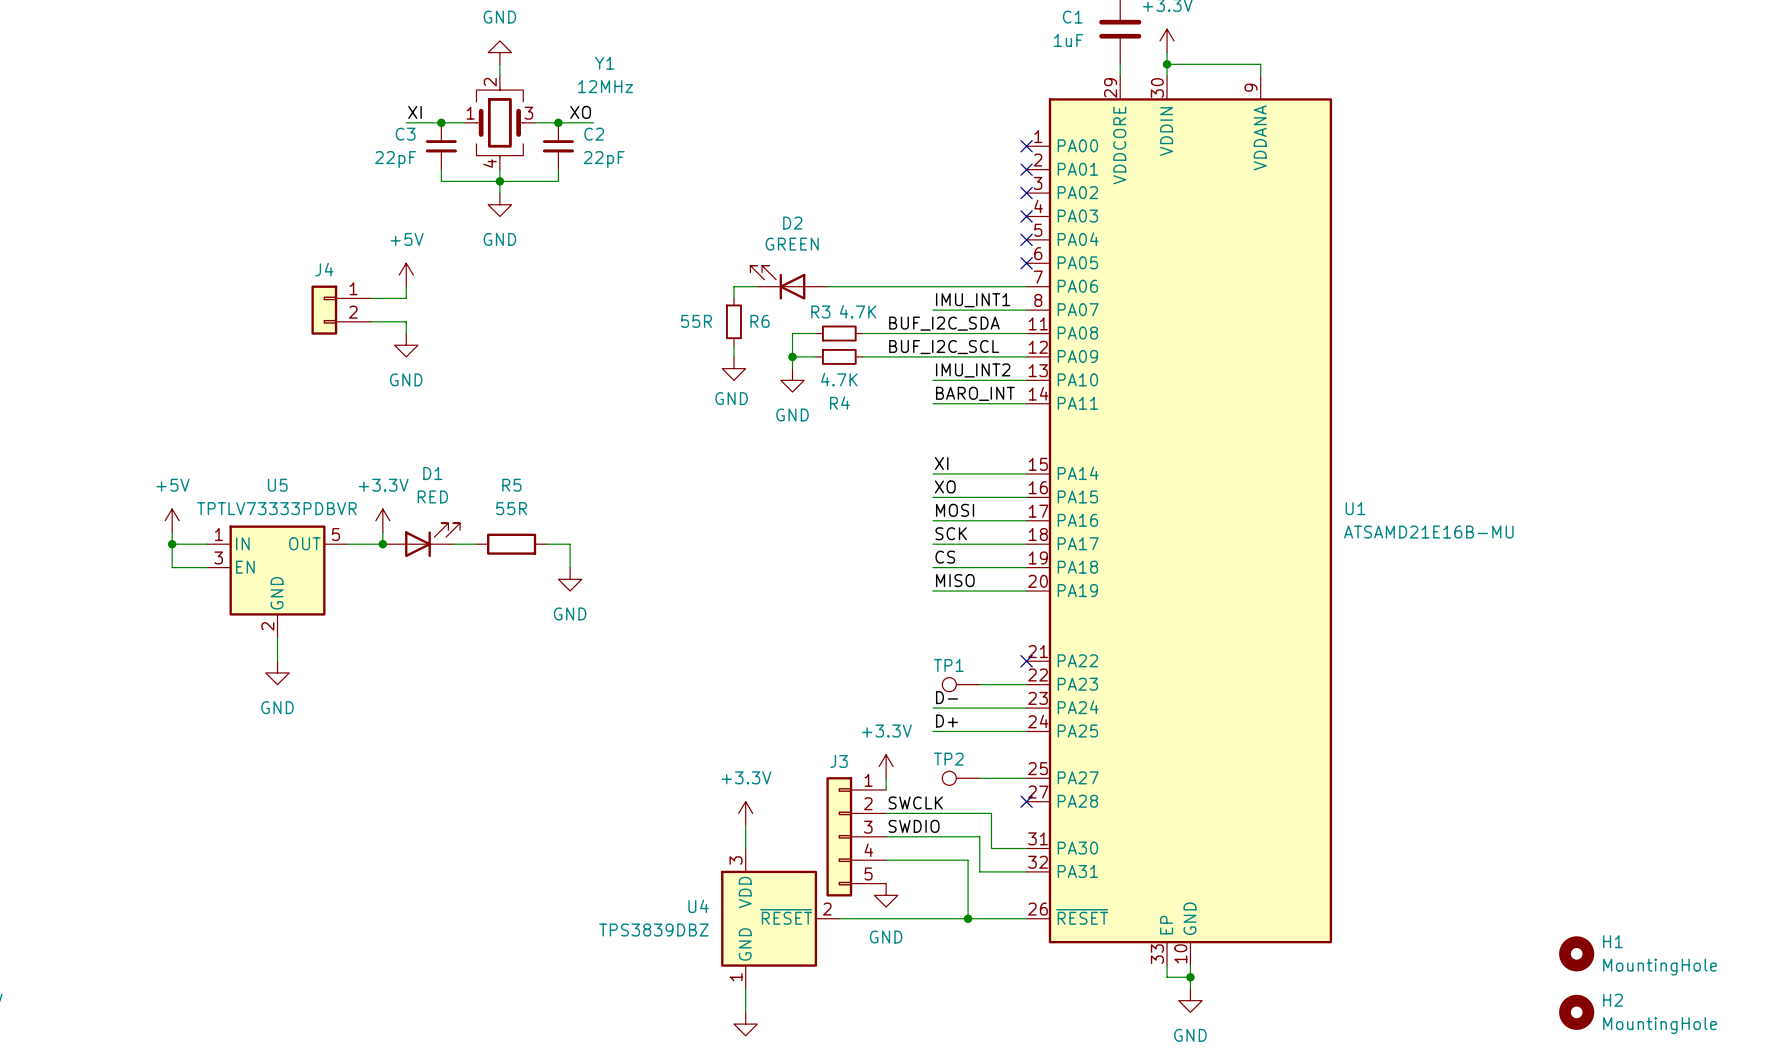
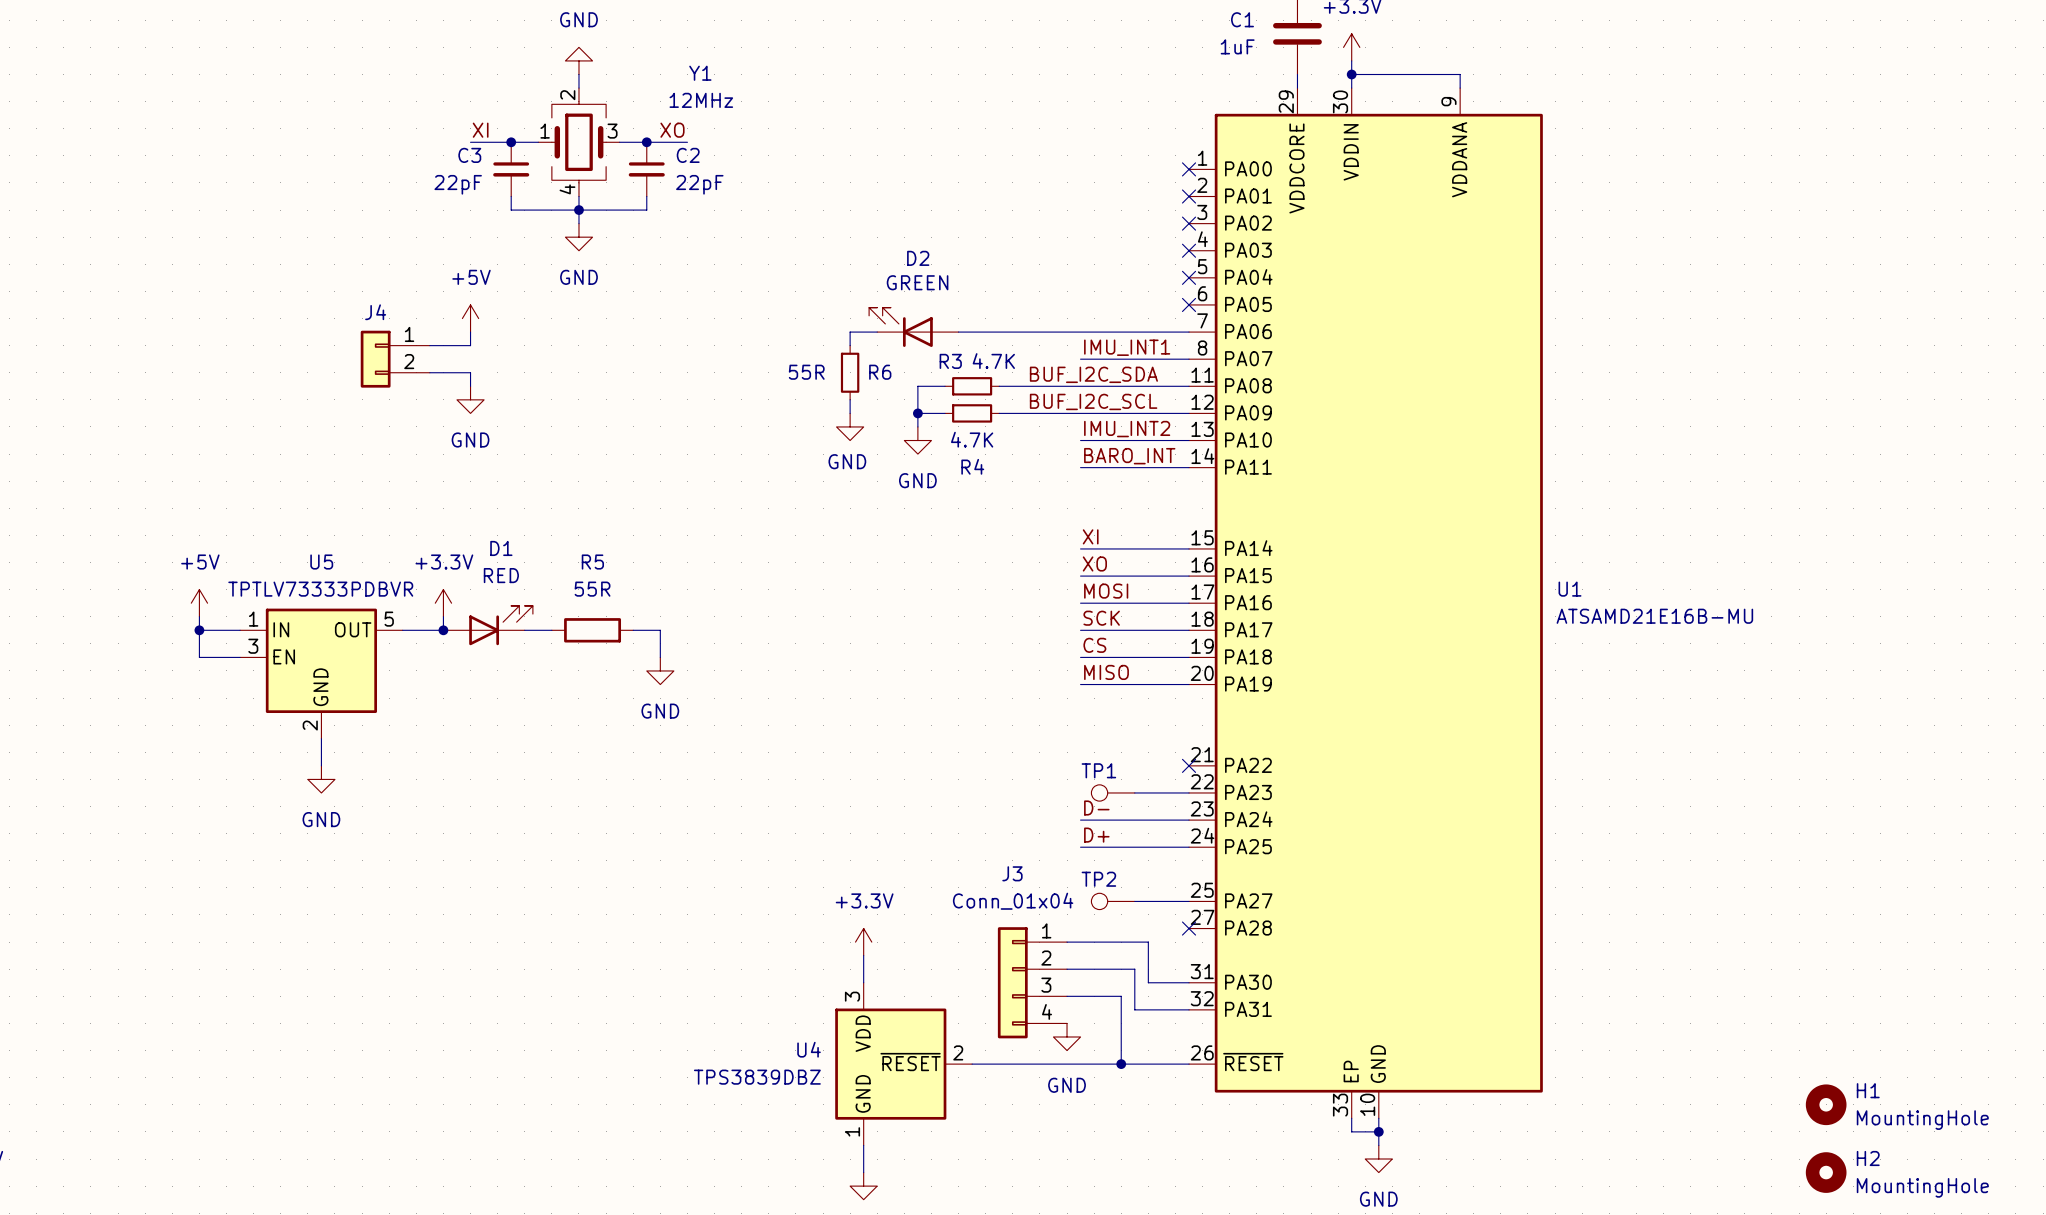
J3 name position: J3 (839, 761) -> J3 (1012, 873)
power symbol: +3.3V (886, 766) -> none
J3 symbol: [826, 777, 887, 897] -> [997, 927, 1068, 1039]
J3 value: none -> Conn_01x04 (1013, 901)
wire: (886, 778) (886, 789) -> none
label: SWCLK (915, 802) -> none
label: SWDIO (914, 826) -> none
power symbol position: GND (886, 895) -> GND (1067, 1036)

